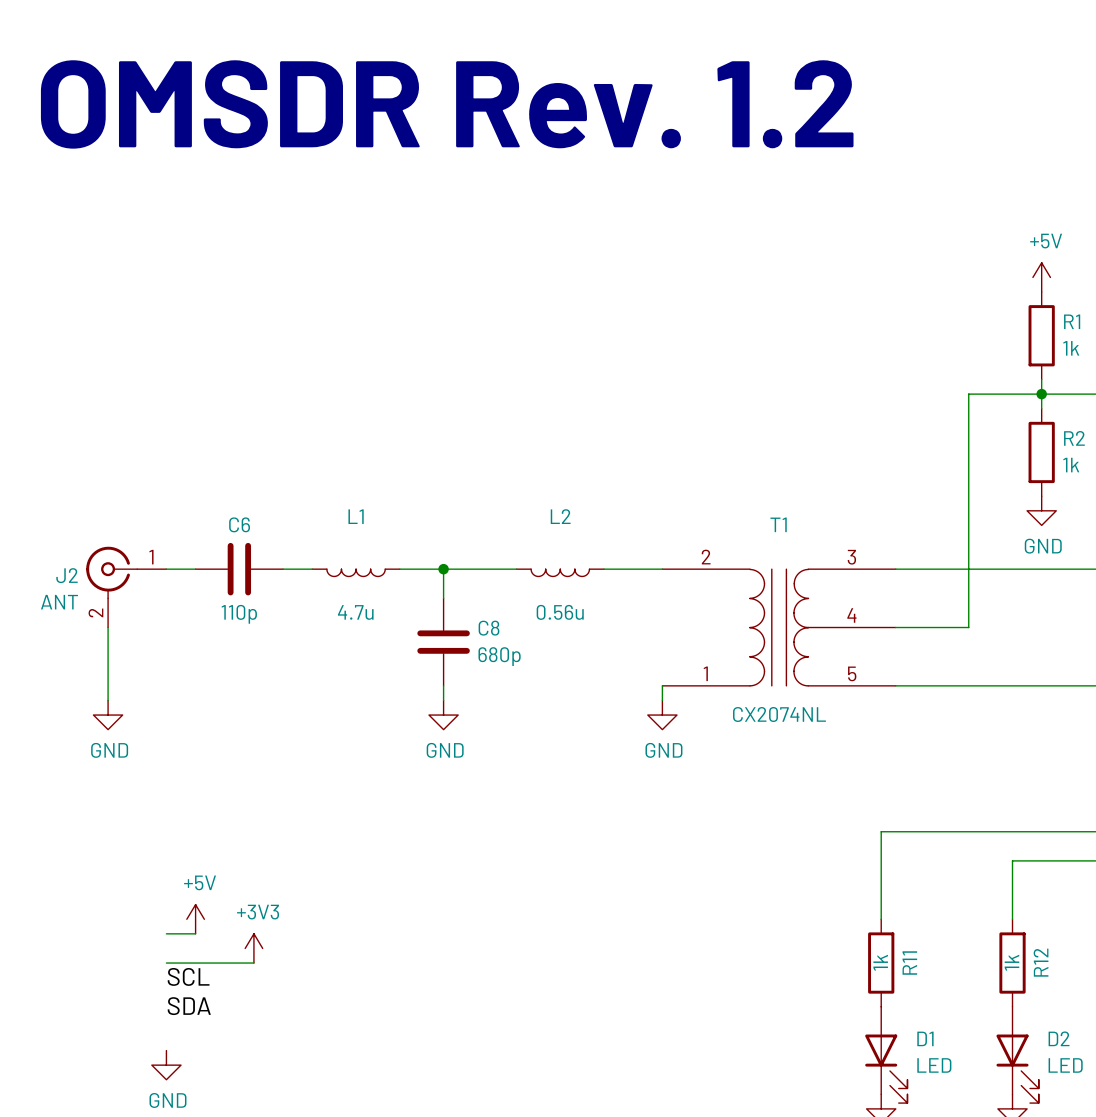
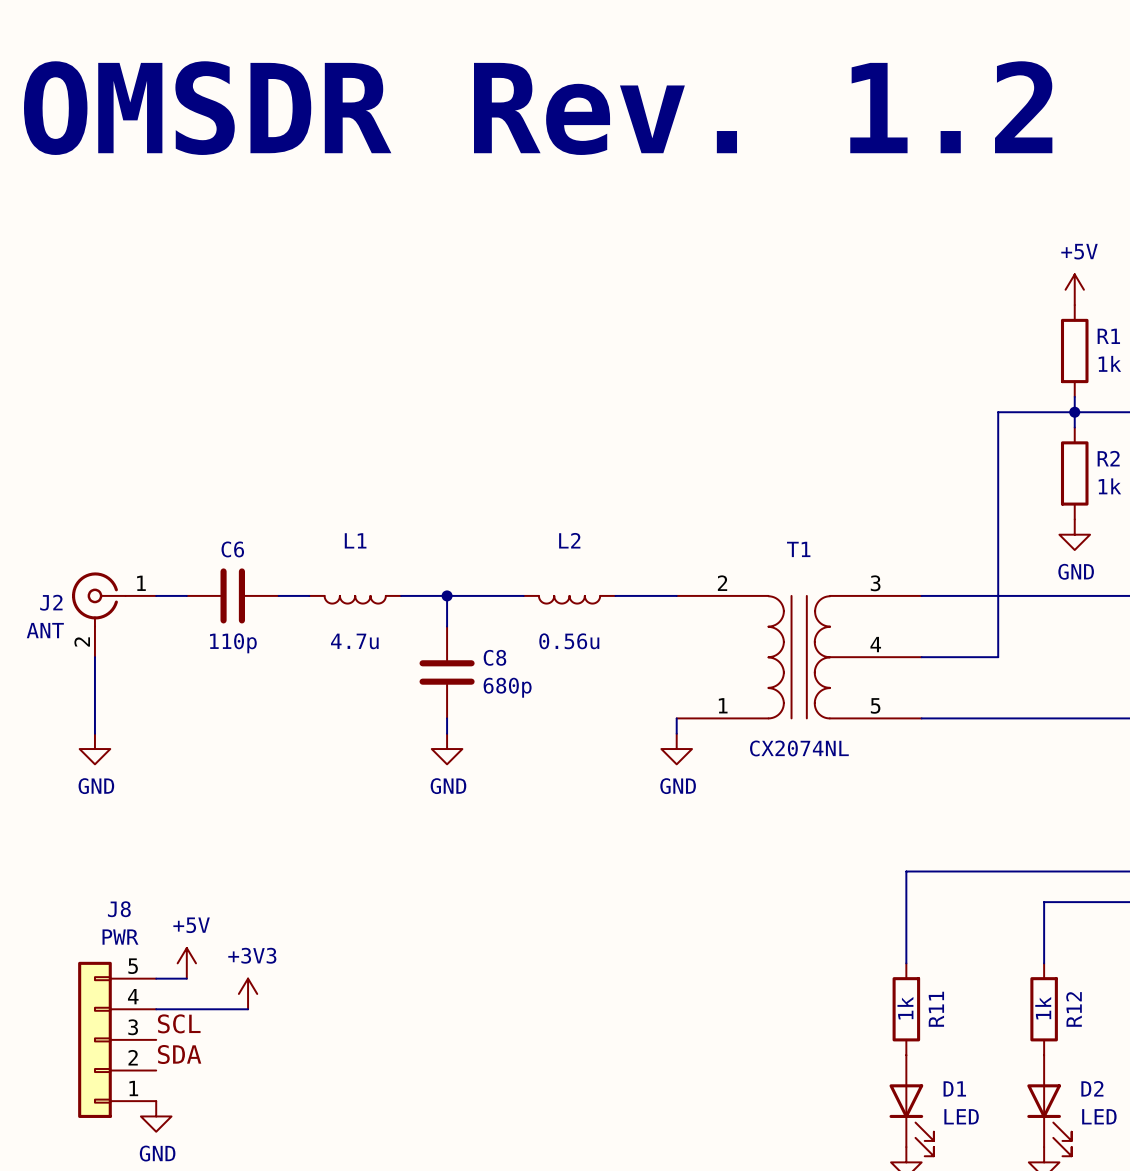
J8: none -> PWR (117, 1039)

